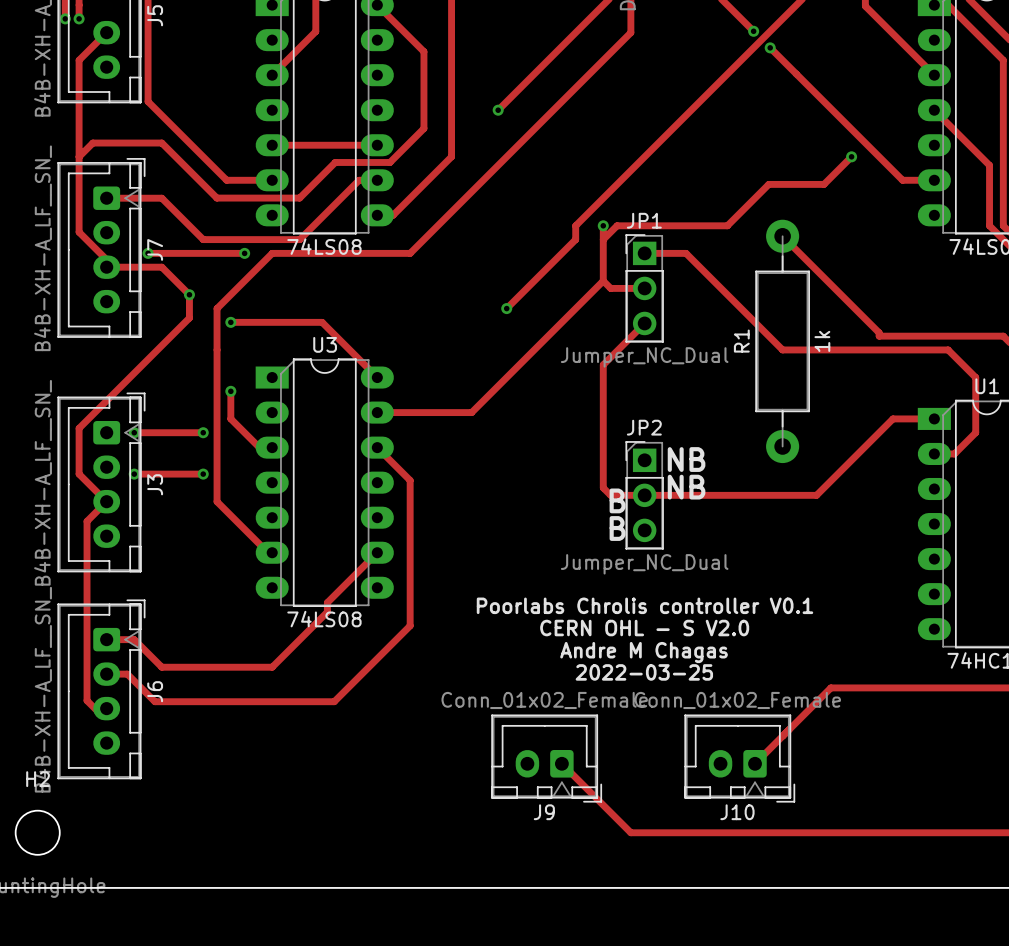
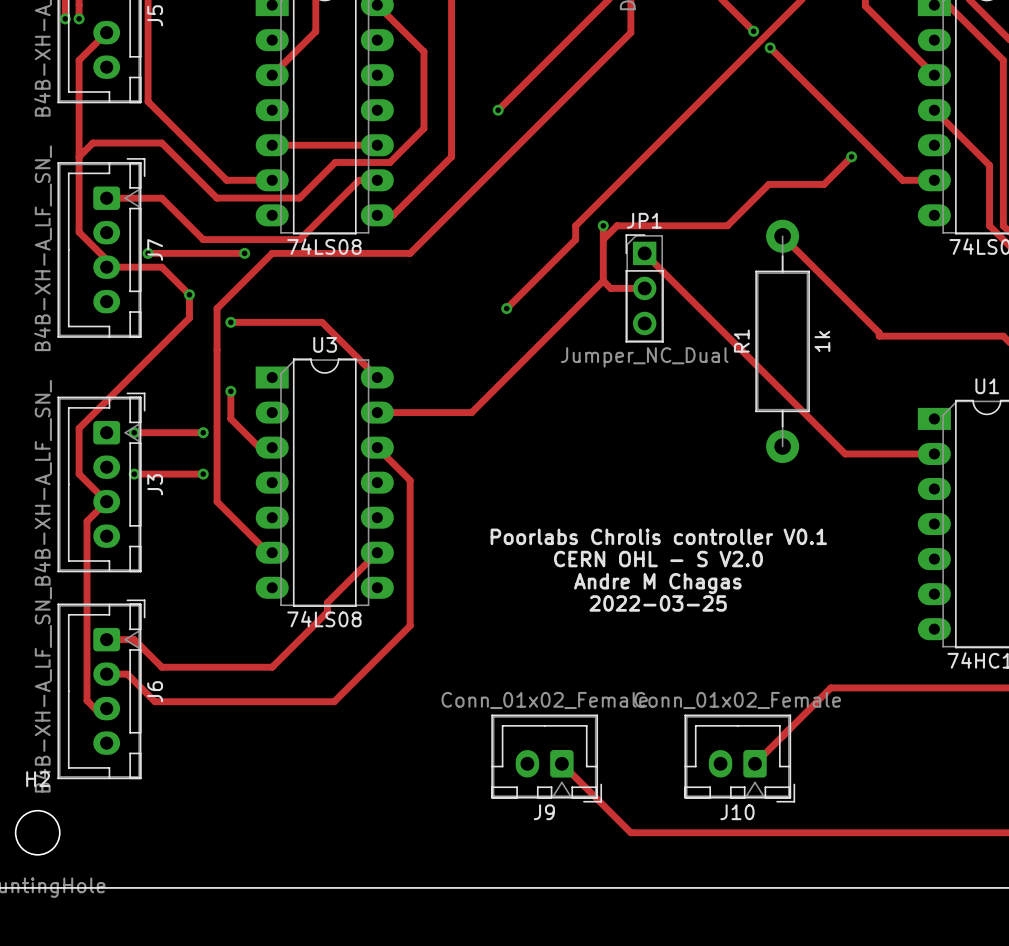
track: (644, 253) (686, 253) (782, 349) (948, 349) (975, 377) (975, 432) (954, 453) (934, 453) -> (644, 253) (845, 453) (934, 453)
track: (644, 323) (603, 364) (603, 487) (610, 495) (816, 495) (892, 418) (934, 418) -> none
text: NB (686, 459) -> none
text: NB (686, 487) -> none
JP2: Jumper_NC_Dual (644, 495) -> none
text: B (617, 500) -> none
text: B (617, 528) -> none
text position: Poorlabs Chrolis controller V0.1 (645, 605) -> Poorlabs Chrolis controller V0.1 (658, 536)
text position: CERN OHL - S V2.0 (644, 628) -> CERN OHL - S V2.0 (658, 559)
text position: Andre M Chagas (644, 652) -> Andre M Chagas (657, 583)
text position: 2022-03-25 (644, 672) -> 2022-03-25 (658, 603)

